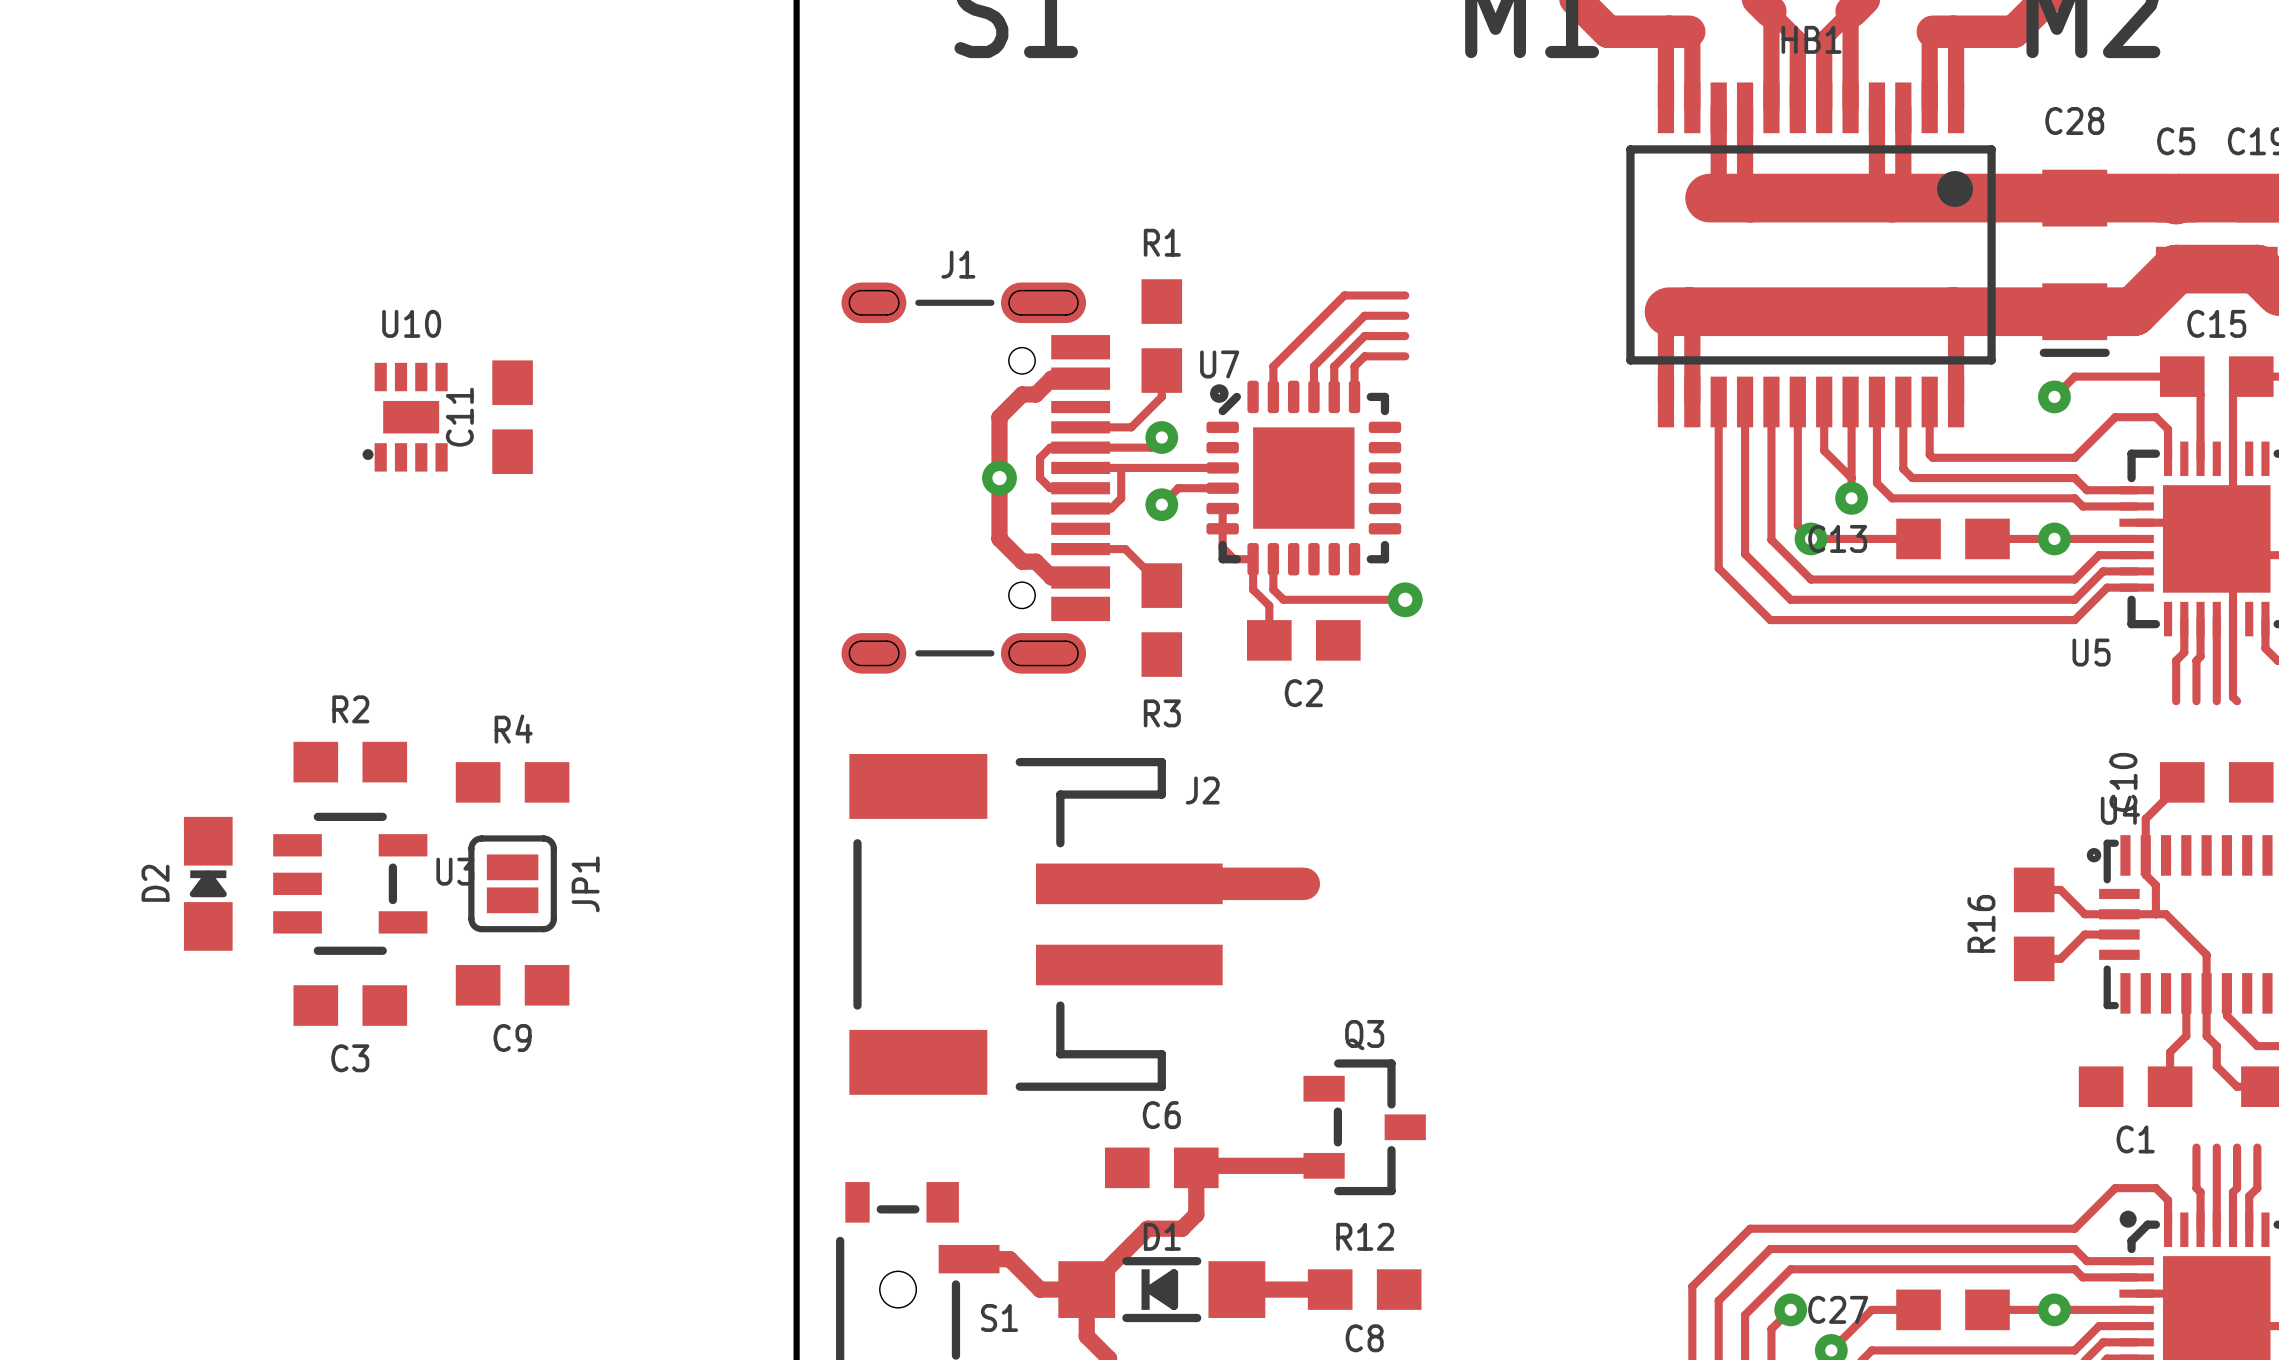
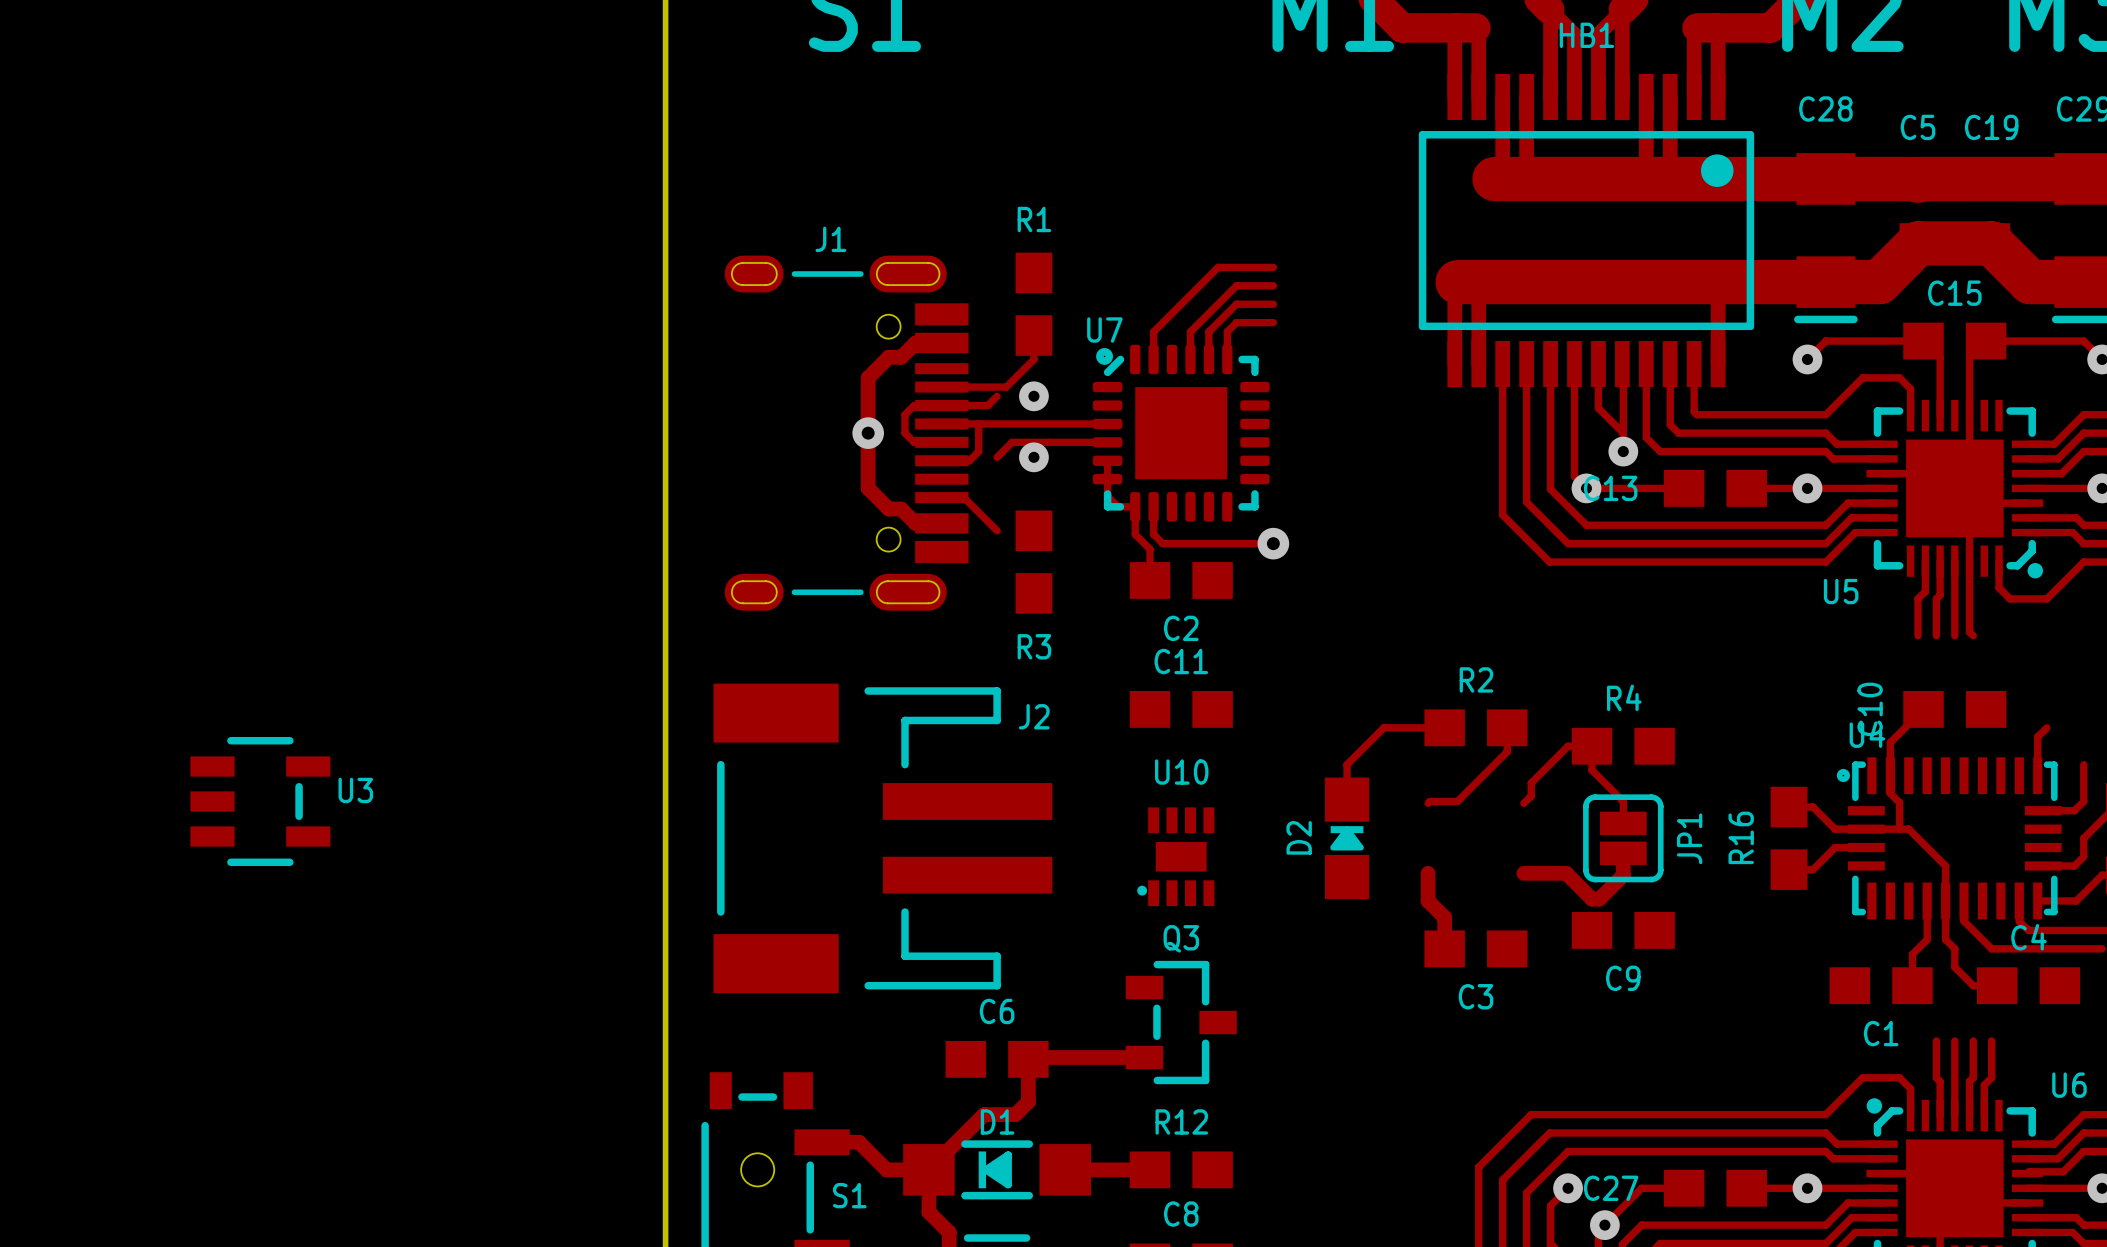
track: (1405, 295) (1344, 295) (1273, 366) (1273, 396) -> none
track: (1405, 315) (1364, 315) (1313, 366) (1313, 396) -> (1273, 285) (1236, 285) (1190, 331) (1190, 359)
R1 position: (1161, 336) -> (1033, 304)
track: (1364, 336) (1405, 336) -> (1181, 304) (1218, 267) (1273, 267)
track: none -> (1273, 304) (1236, 304) (1208, 331) (1208, 359)
track: (1405, 356) (1364, 356) (1354, 366) (1354, 396) -> (1273, 322) (1236, 322) (1227, 331) (1227, 359)
track: (1161, 370) (1161, 396) (1131, 427) -> (1033, 335) (1033, 359) (1006, 387) (969, 387)
track: (1072, 378) (1051, 378) (1035, 394) (1022, 394) (999, 417) (999, 538) (1022, 561) (1035, 561) (1051, 577) (1072, 577) -> (915, 342) (901, 357) (888, 357) (868, 377) (868, 488) (888, 509) (901, 509) (915, 523)
U10 position: (405, 417) -> (1175, 856)
C11 rotation: 0° (512, 417) -> 90° clockwise (1181, 709)
C11 position: (512, 417) -> (1181, 709)
via: (1161, 437) -> none
via: none -> (1033, 396)
track: (1070, 447) (1050, 447) (1040, 457) (1040, 478) (1050, 488) (1070, 488) -> (914, 405) (905, 414) (905, 433) (914, 442)
track: (1121, 467) (1121, 498) (1111, 508) -> (978, 423) (978, 451) (969, 460) (951, 460)
track: none -> (1052, 423) (1107, 423)
J1 position: (975, 478) -> (846, 433)
via position: (999, 478) -> (868, 433)
U7 position: (1303, 478) -> (1181, 433)
track: none -> (1052, 442) (1107, 442)
via: (1161, 504) -> none
via: none -> (1033, 457)
track: (1222, 508) (1222, 547) (1234, 559) (1253, 559) (1253, 589) (1269, 605) (1269, 640) -> (1107, 460) (1107, 496) (1118, 506) (1135, 506) (1135, 534) (1149, 549) (1149, 580)
track: (1273, 559) (1273, 589) (1283, 599) (1344, 599) -> (1153, 506) (1153, 534) (1162, 543)
track: none -> (1218, 543) (1273, 543)
via position: (1405, 599) -> (1273, 543)
R3 position: (1161, 620) -> (1033, 562)
C2 position: (1303, 640) -> (1181, 580)
R2 position: (350, 762) -> (1475, 727)
R4 position: (512, 782) -> (1623, 746)
track: none -> (1444, 727) (1383, 727) (1347, 764) (1347, 799)
track: none -> (1507, 727) (1507, 751) (1457, 801) (1429, 801) (1428, 803)
D2 position: (208, 883) -> (1347, 838)
JP1 position: (512, 883) -> (1623, 838)
track: (1129, 883) (1303, 883) -> none
track: none -> (1523, 803) (1531, 795) (1531, 783) (1568, 746) (1592, 746) (1592, 770) (1623, 801) (1623, 823)
track: none -> (1623, 853) (1623, 875) (1599, 899) (1592, 899) (1566, 873) (1523, 873)
track: none -> (1428, 873) (1428, 900) (1444, 917) (1444, 948)
C9 position: (512, 985) -> (1623, 930)
C3 position: (350, 1005) -> (1475, 948)

